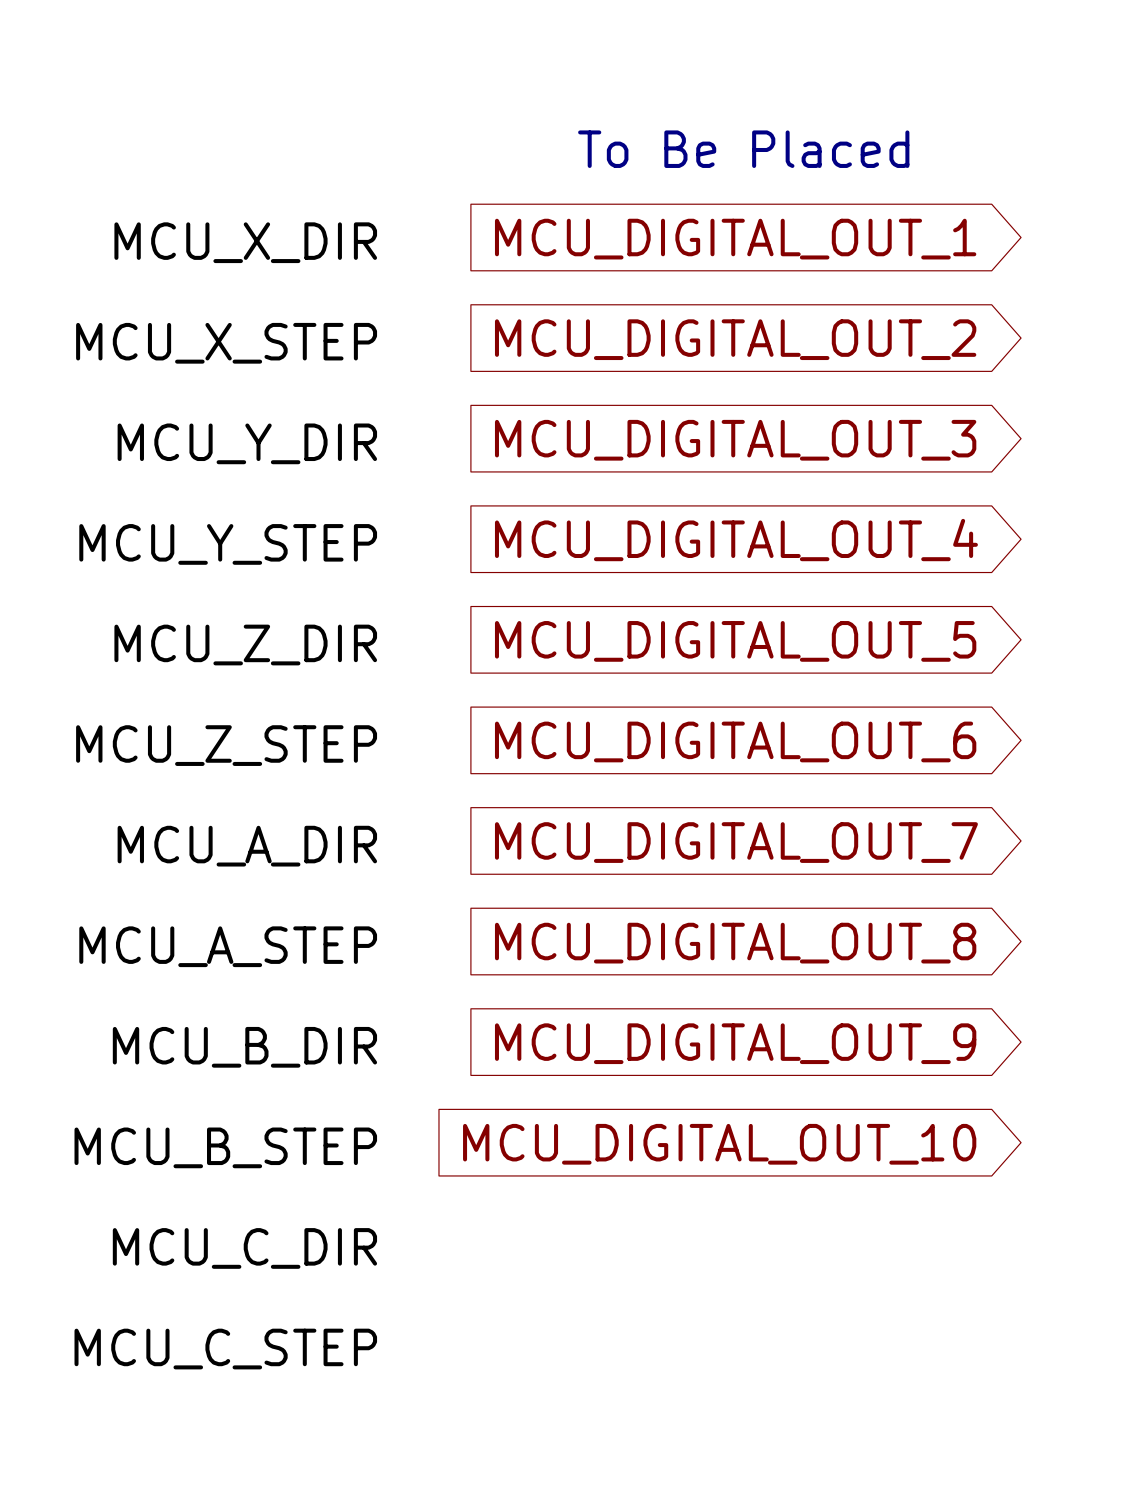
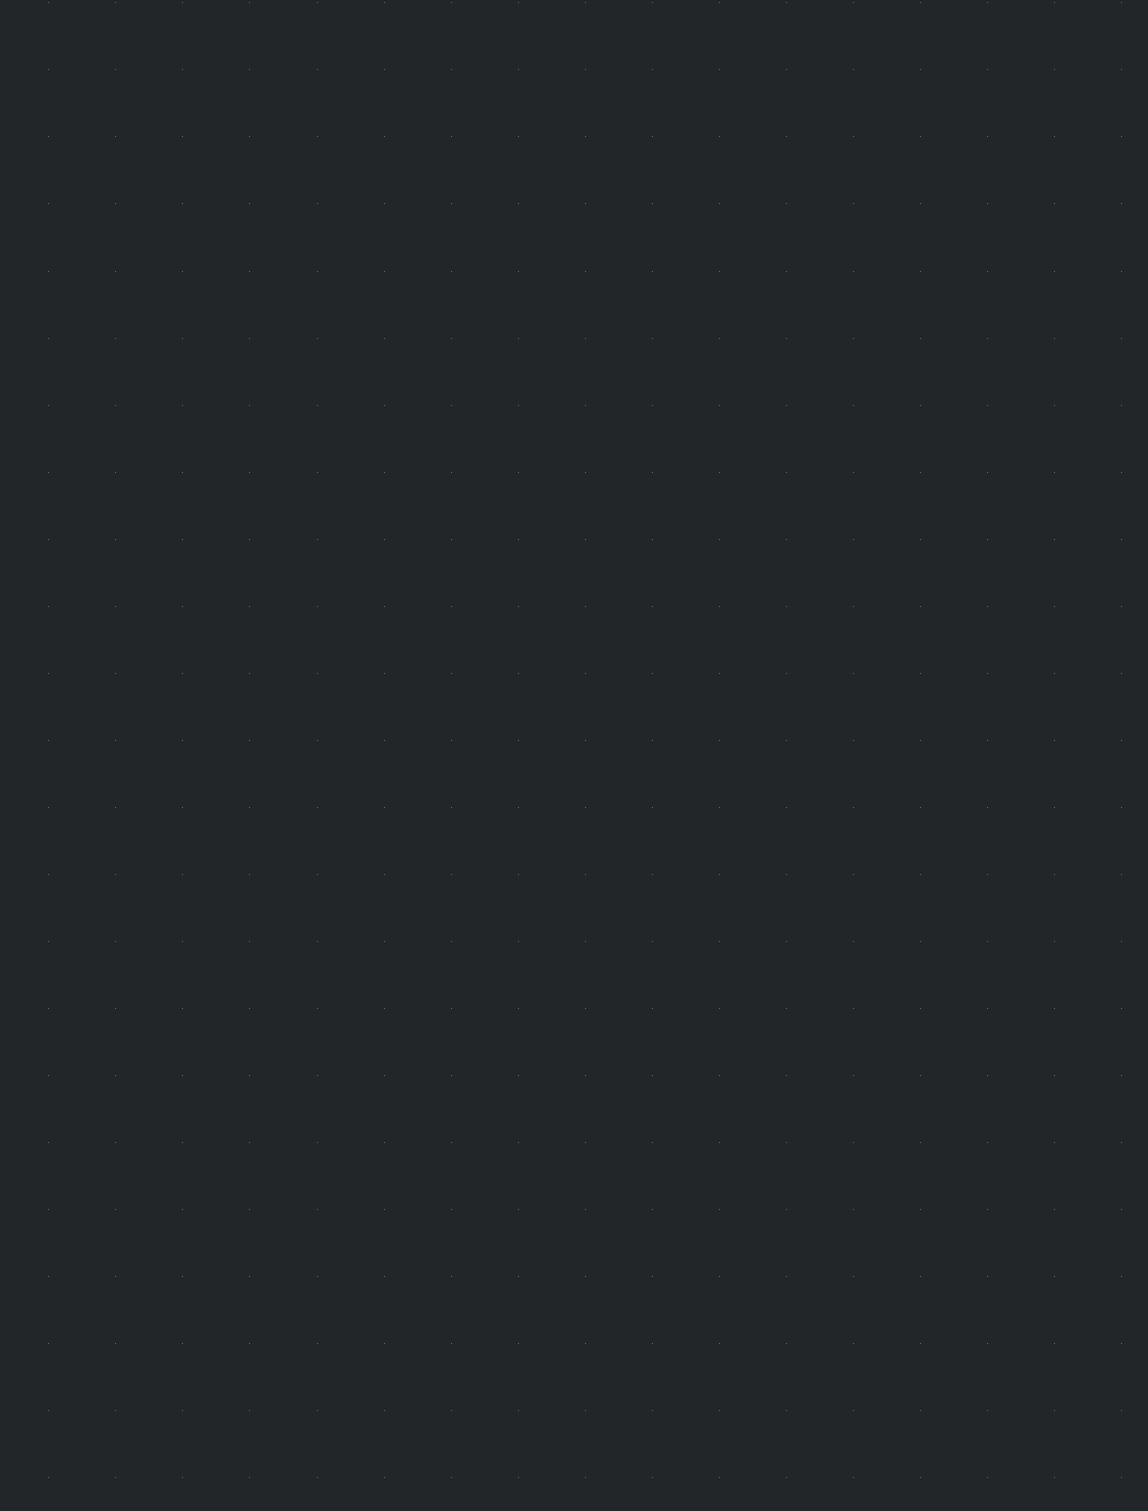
text: To Be Placed (743, 149) -> none
global label: MCU_DIGITAL_OUT_1 (735, 239) -> none
label: MCU_X_DIR (245, 242) -> none
global label: MCU_DIGITAL_OUT_2 (735, 339) -> none
label: MCU_X_STEP (226, 343) -> none
global label: MCU_DIGITAL_OUT_3 (735, 440) -> none
label: MCU_Y_DIR (247, 443) -> none
global label: MCU_DIGITAL_OUT_4 (736, 540) -> none
label: MCU_Y_STEP (228, 544) -> none
global label: MCU_DIGITAL_OUT_5 (735, 641) -> none
label: MCU_Z_DIR (245, 645) -> none
global label: MCU_DIGITAL_OUT_6 (735, 741) -> none
label: MCU_Z_STEP (226, 745) -> none
global label: MCU_DIGITAL_OUT_7 (736, 842) -> none
label: MCU_A_DIR (247, 846) -> none
global label: MCU_DIGITAL_OUT_8 (735, 943) -> none
label: MCU_A_STEP (228, 946) -> none
global label: MCU_DIGITAL_OUT_9 (735, 1043) -> none
label: MCU_B_DIR (244, 1047) -> none
global label: MCU_DIGITAL_OUT_10 (719, 1144) -> none
label: MCU_B_STEP (225, 1147) -> none
label: MCU_C_DIR (244, 1248) -> none
label: MCU_C_STEP (225, 1349) -> none

